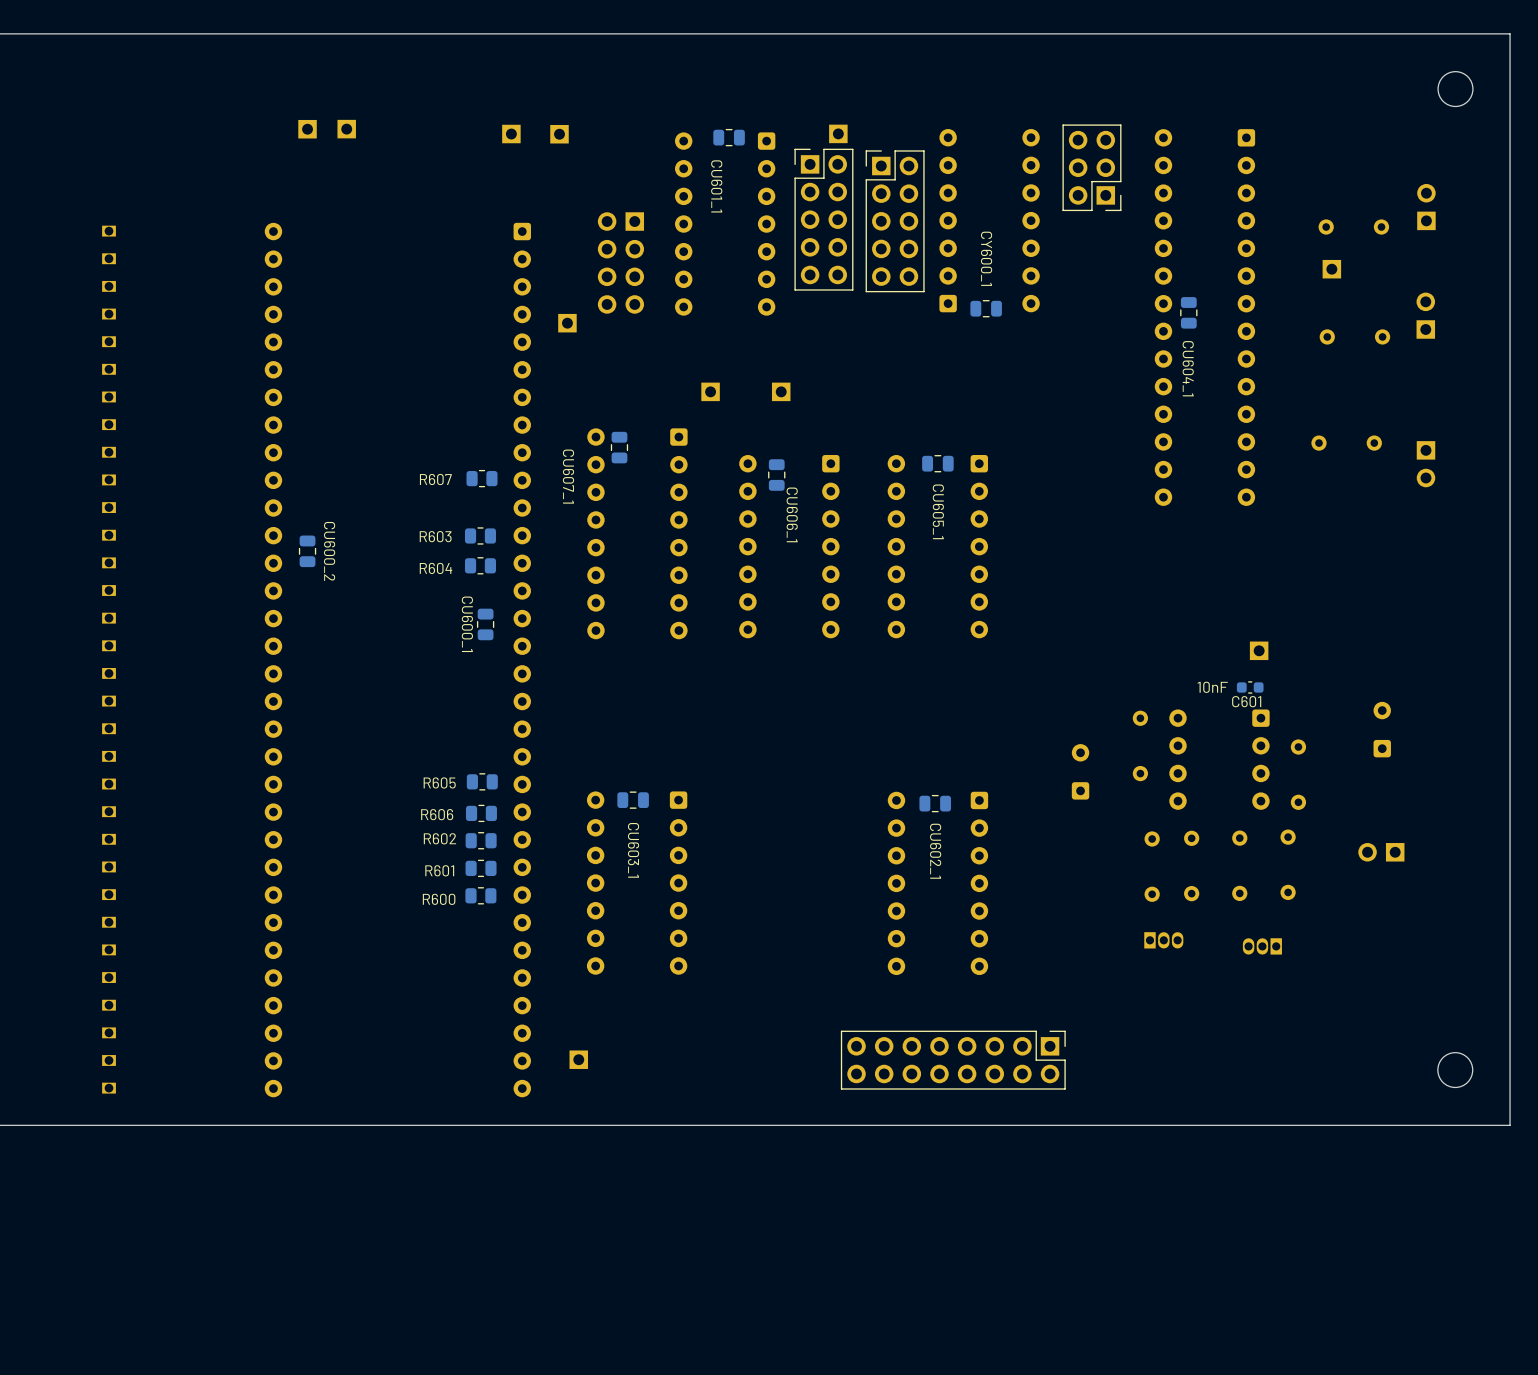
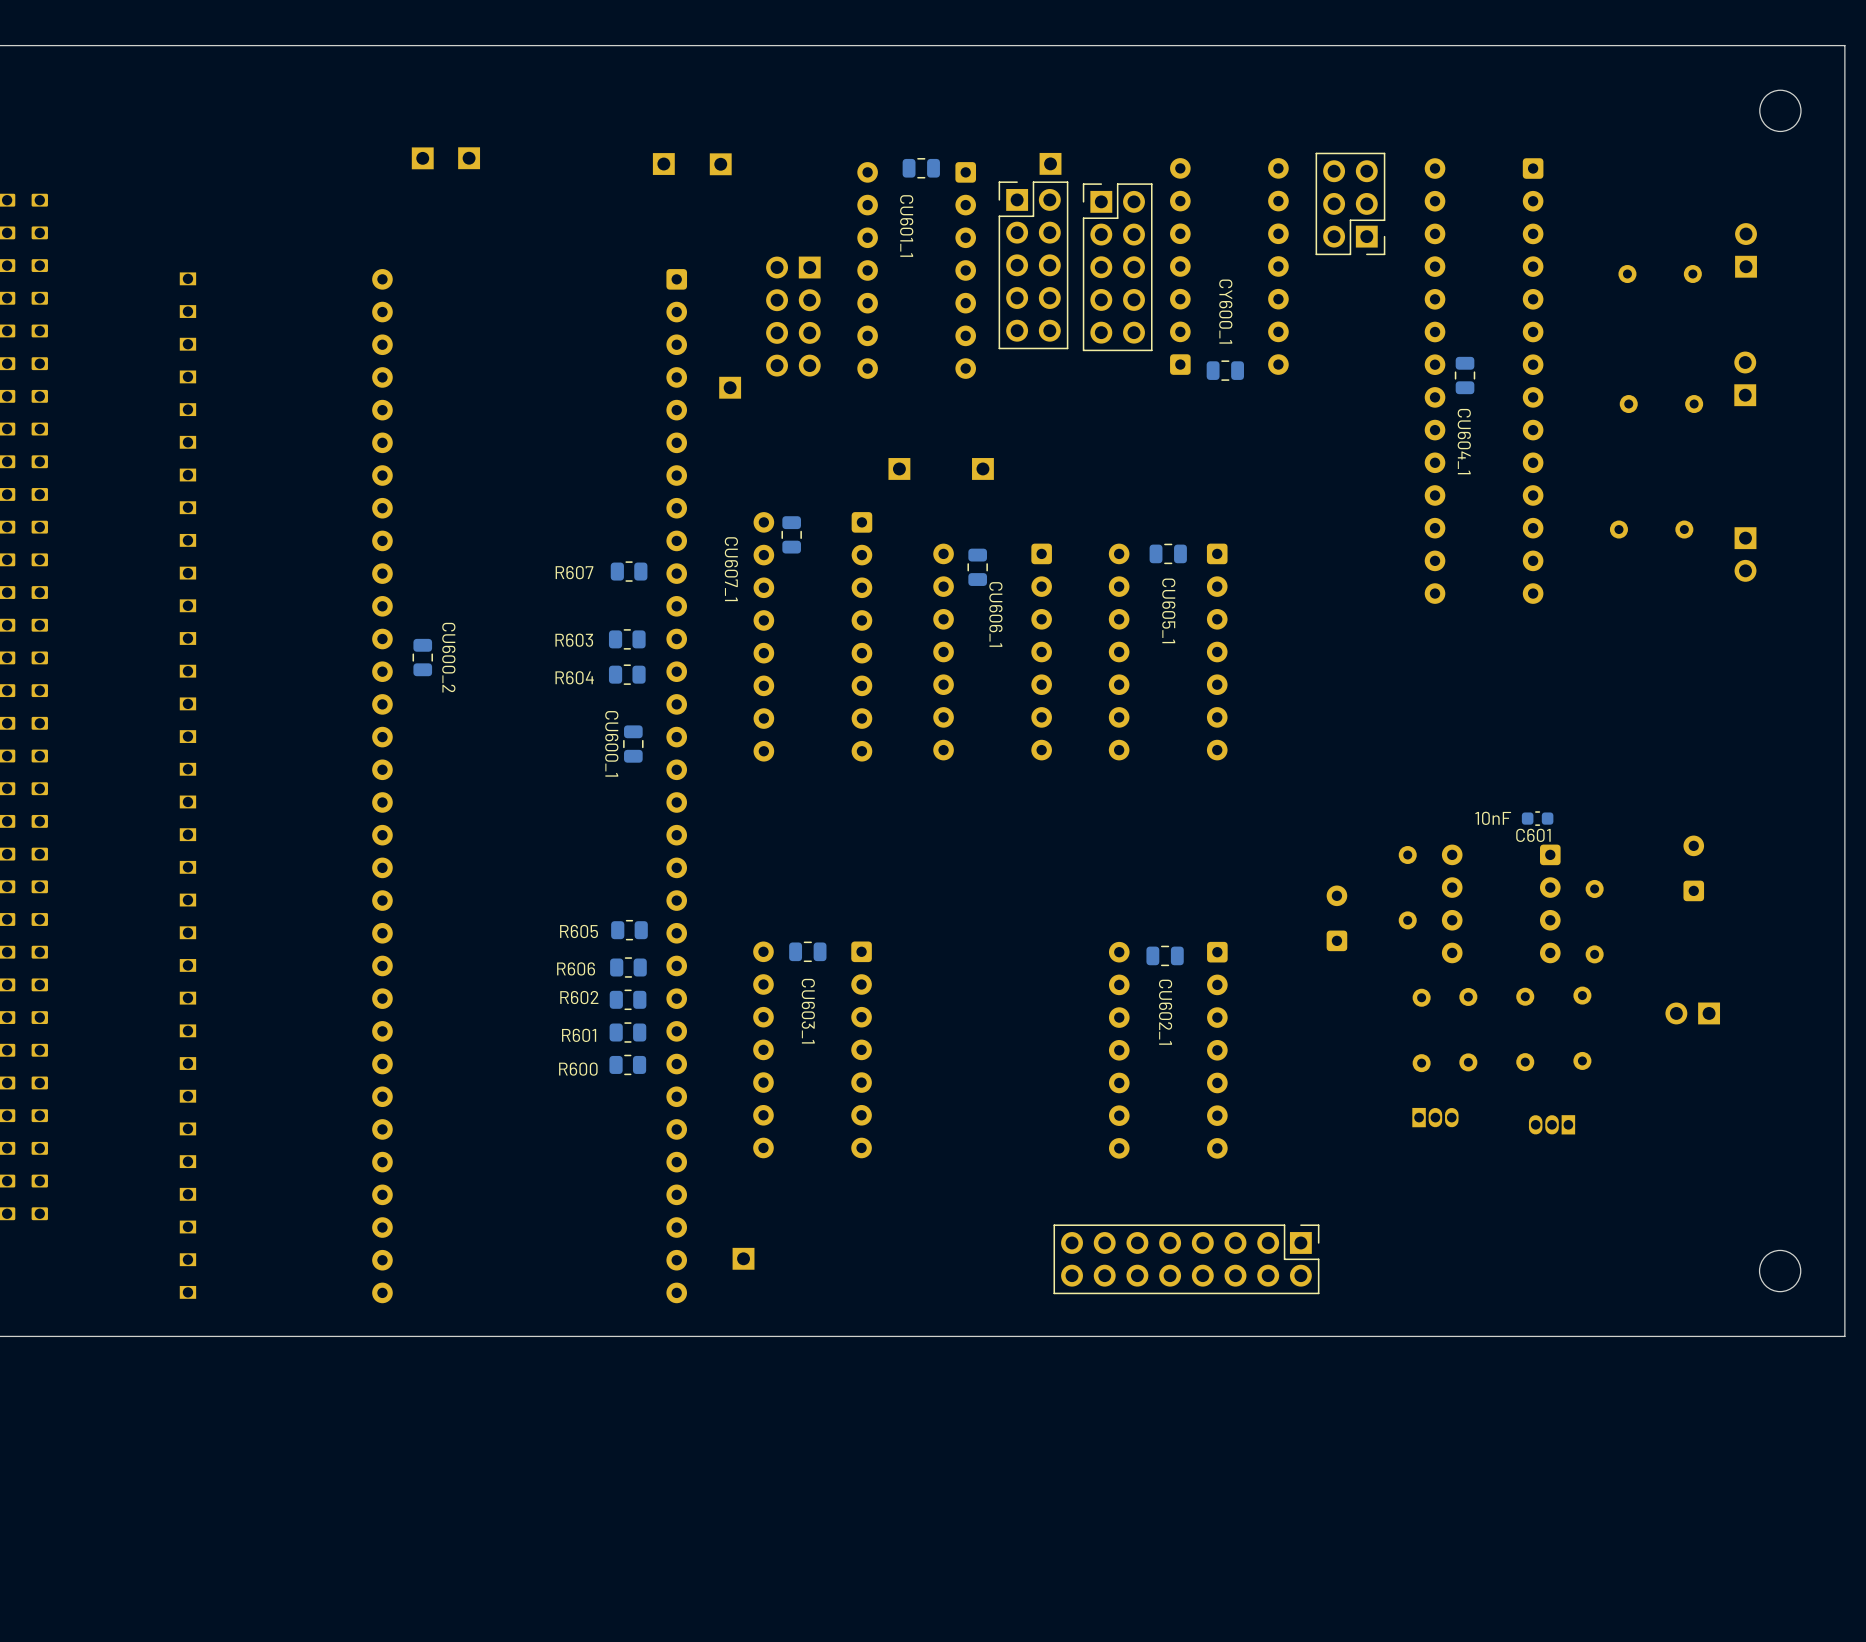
part: (1331, 269) -> none
part: (1259, 650) -> none

